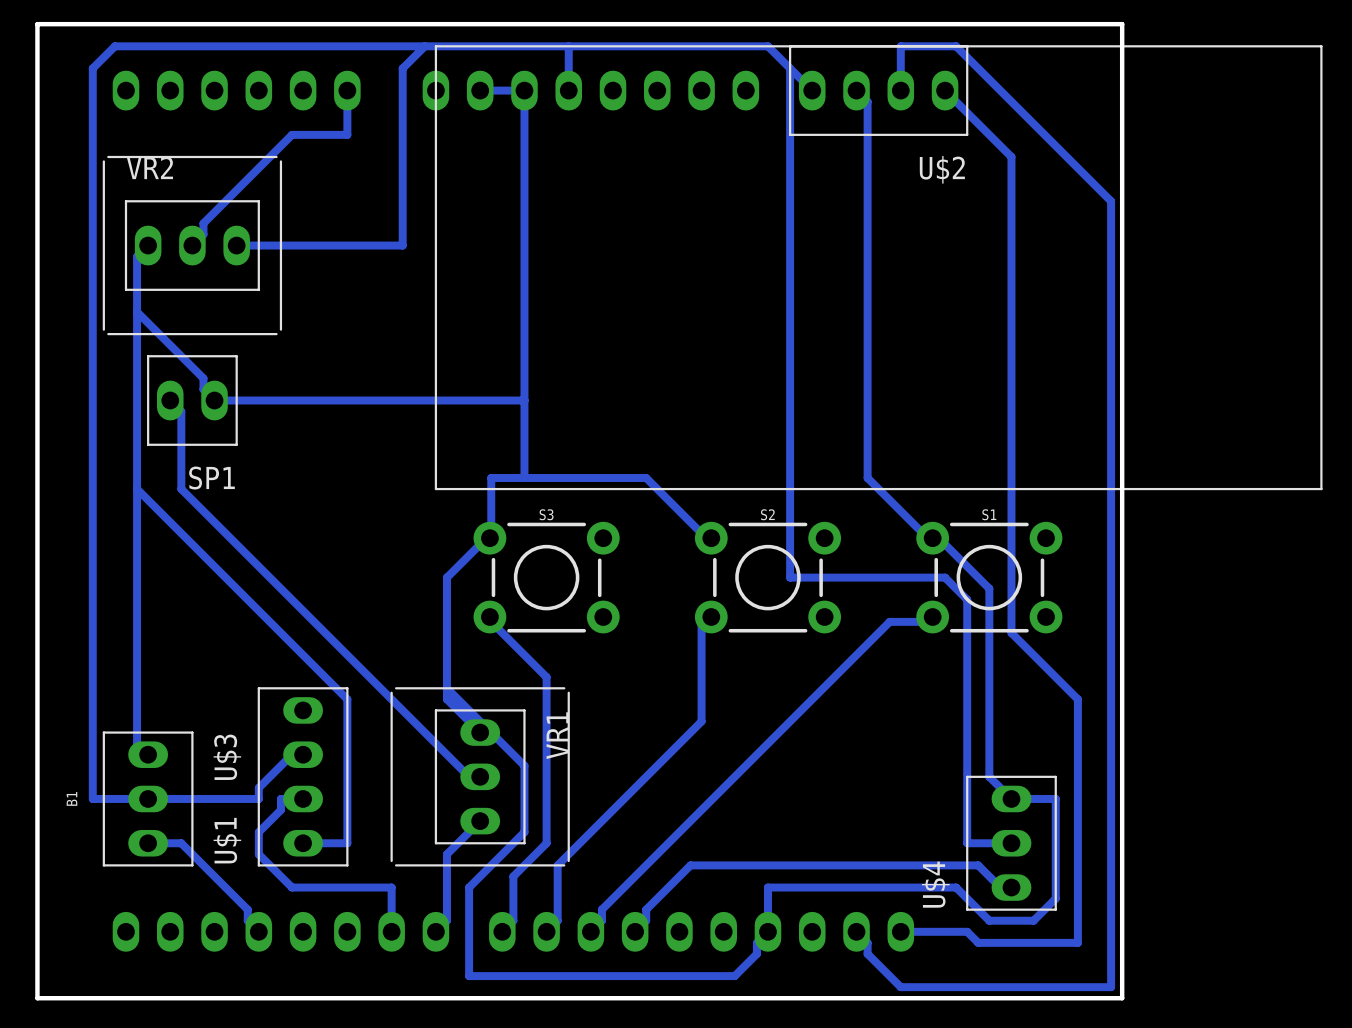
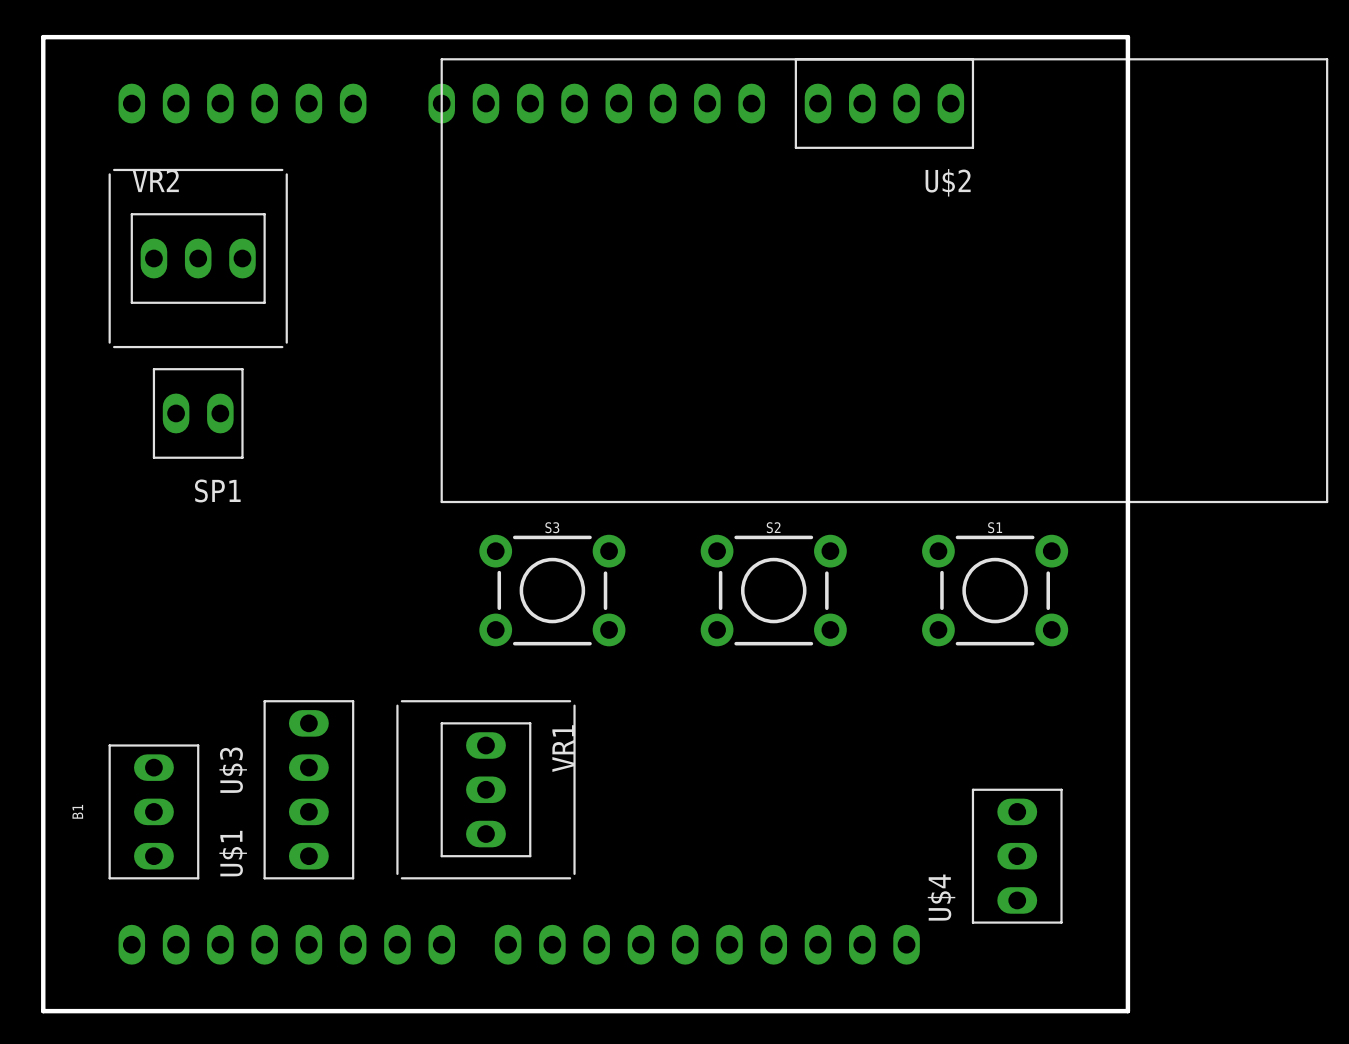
bottom track: (424, 46) (402, 68) (402, 245) (236, 245) -> none
bottom track: (568, 46) (568, 90) -> none
bottom track: (790, 68) (790, 577) (945, 577) (967, 599) (967, 843) (1011, 843) -> none
bottom track: (347, 90) (347, 134) (292, 134) (203, 223) (203, 234) (192, 245) -> none
bottom track: (480, 90) (524, 90) (524, 477) -> none
bottom track: (812, 90) (767, 46) (114, 46) (92, 68) (92, 798) (258, 798) (258, 787) (292, 754) (303, 754) -> none
bottom track: (856, 90) (867, 101) (867, 477) (922, 533) (932, 538) (934, 533) (989, 588) (989, 776) (1011, 798) (1055, 798) (1055, 898) (1033, 920) (989, 920) (956, 887) (767, 887) (767, 931) (756, 942) (756, 953) (734, 976) (469, 976) (469, 887) (524, 832) (524, 765) (446, 688) -> none
bottom track: (900, 90) (900, 46) (956, 46) (1111, 201) (1111, 987) (900, 987) (867, 953) (867, 942) (856, 931) -> none
bottom track: (945, 90) (1011, 156) (1011, 632) (1077, 699) (1077, 942) (978, 942) (967, 931) (900, 931) -> none
bottom track: (148, 245) (137, 256) (137, 743) (148, 754) -> none
bottom track: (137, 311) (203, 378) (203, 389) (214, 400) (524, 400) -> none
bottom track: (170, 400) (181, 411) (181, 489) (469, 776) (480, 776) -> none
bottom track: (137, 489) (347, 699) (347, 843) (303, 843) -> none
bottom track: (711, 538) (701, 533) (646, 477) (491, 477) (489, 538) (480, 544) (446, 577) (446, 699) (480, 732) -> none
bottom track: (489, 617) (491, 621) (546, 677) (546, 843) (513, 876) (513, 920) (502, 931) -> none
bottom track: (711, 617) (701, 621) (701, 721) (557, 865) (557, 920) (546, 931) -> none
bottom track: (932, 617) (922, 621) (889, 621) (601, 909) (601, 920) (590, 931) -> none
bottom track: (303, 798) (280, 798) (280, 810) (258, 832) (258, 854) (292, 887) (391, 887) (391, 931) -> none
bottom track: (480, 821) (446, 854) (446, 920) (435, 931) -> none
bottom track: (148, 843) (181, 843) (247, 909) (247, 920) (258, 931) -> none
bottom track: (1011, 887) (1000, 887) (978, 865) (690, 865) (646, 909) (646, 920) (635, 931) -> none

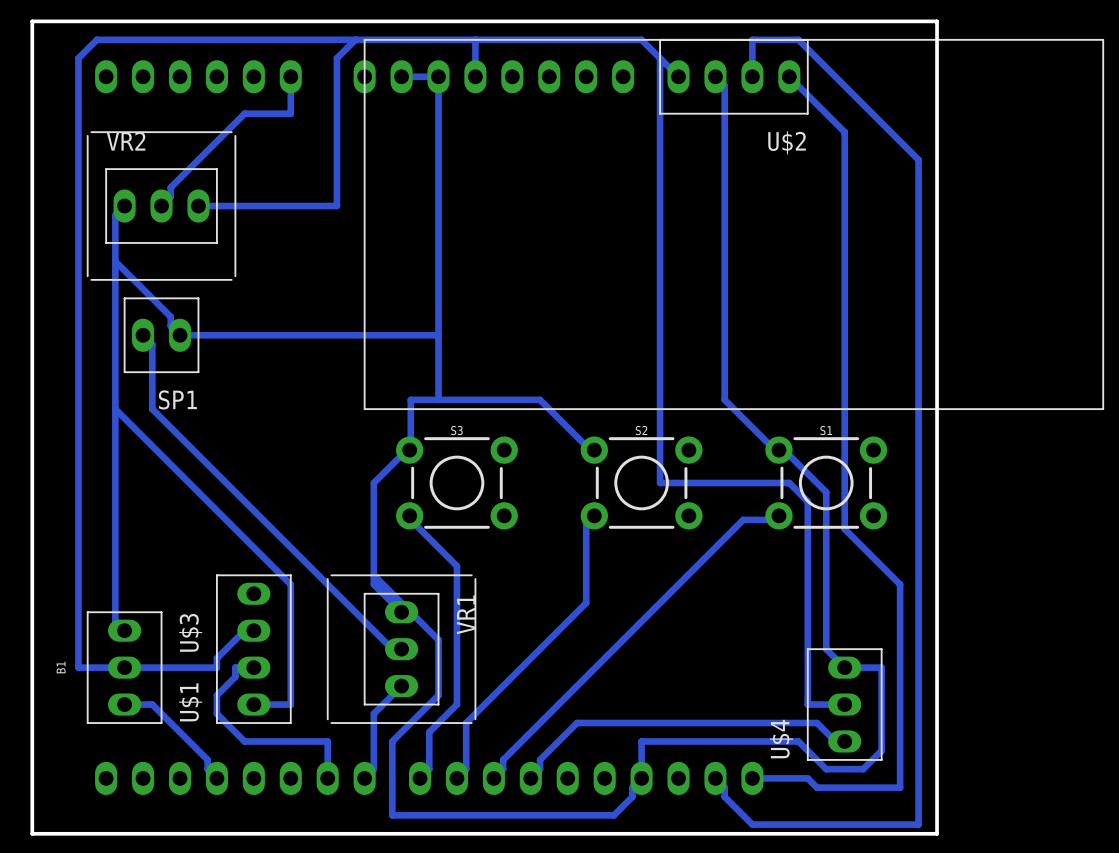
bottom track: none -> (355, 39) (336, 58) (336, 206) (198, 206)
bottom track: none -> (475, 39) (475, 76)
bottom track: none -> (660, 58) (660, 482) (789, 482) (807, 501) (807, 704) (844, 704)
bottom track: none -> (290, 76) (290, 113) (244, 113) (170, 187) (170, 196) (161, 206)
bottom track: none -> (401, 76) (438, 76) (438, 399)
bottom track: none -> (678, 76) (641, 39) (96, 39) (78, 58) (78, 667) (216, 667) (216, 658) (244, 630) (253, 630)
bottom track: none -> (715, 76) (724, 86) (724, 399) (770, 446) (778, 450) (780, 446) (826, 492) (826, 649) (844, 667) (881, 667) (881, 750) (863, 769) (826, 769) (798, 741) (641, 741) (641, 778) (632, 787) (632, 796) (613, 815) (392, 815) (392, 741) (438, 695) (438, 639) (373, 575)
bottom track: none -> (752, 76) (752, 39) (798, 39) (918, 159) (918, 824) (752, 824) (724, 796) (724, 787) (715, 778)
bottom track: none -> (789, 76) (844, 132) (844, 529) (900, 584) (900, 787) (817, 787) (807, 778) (752, 778)
bottom track: none -> (124, 206) (115, 215) (115, 621) (124, 630)
bottom track: none -> (115, 261) (170, 316) (170, 326) (180, 335) (438, 335)
bottom track: none -> (143, 335) (152, 344) (152, 409) (392, 649) (401, 649)
bottom track: none -> (115, 409) (290, 584) (290, 704) (253, 704)
bottom track: none -> (594, 450) (586, 446) (540, 399) (410, 399) (409, 450) (401, 455) (373, 482) (373, 584) (401, 612)
bottom track: none -> (409, 515) (410, 519) (456, 566) (456, 704) (429, 732) (429, 769) (420, 778)
bottom track: none -> (594, 515) (586, 519) (586, 603) (466, 723) (466, 769) (456, 778)
bottom track: none -> (778, 515) (770, 519) (743, 519) (503, 759) (503, 769) (493, 778)
bottom track: none -> (253, 667) (235, 667) (235, 676) (216, 695) (216, 713) (244, 741) (327, 741) (327, 778)
bottom track: none -> (401, 686) (373, 713) (373, 769) (364, 778)
bottom track: none -> (124, 704) (152, 704) (207, 759) (207, 769) (216, 778)
bottom track: none -> (844, 741) (835, 741) (817, 723) (576, 723) (540, 759) (540, 769) (530, 778)

